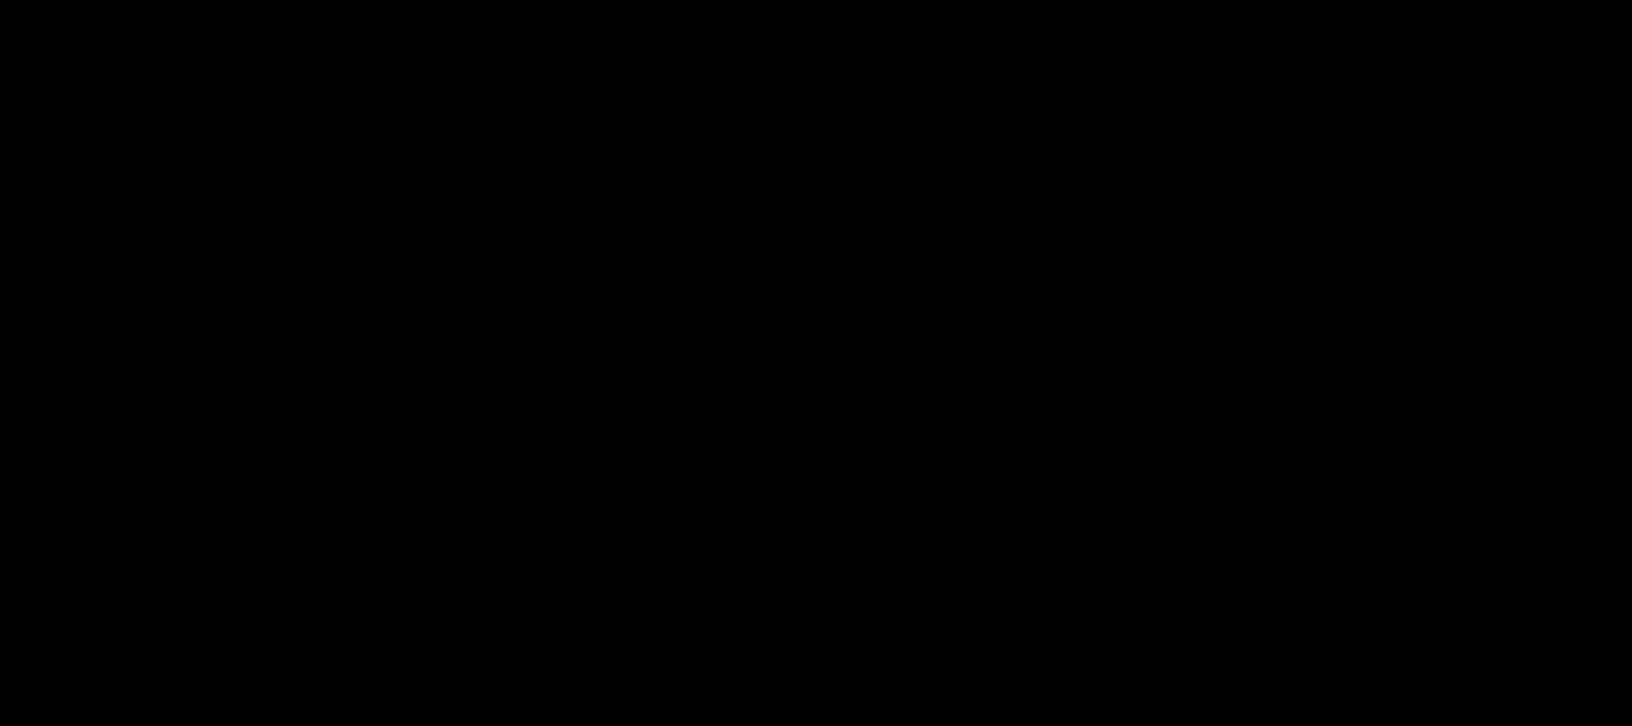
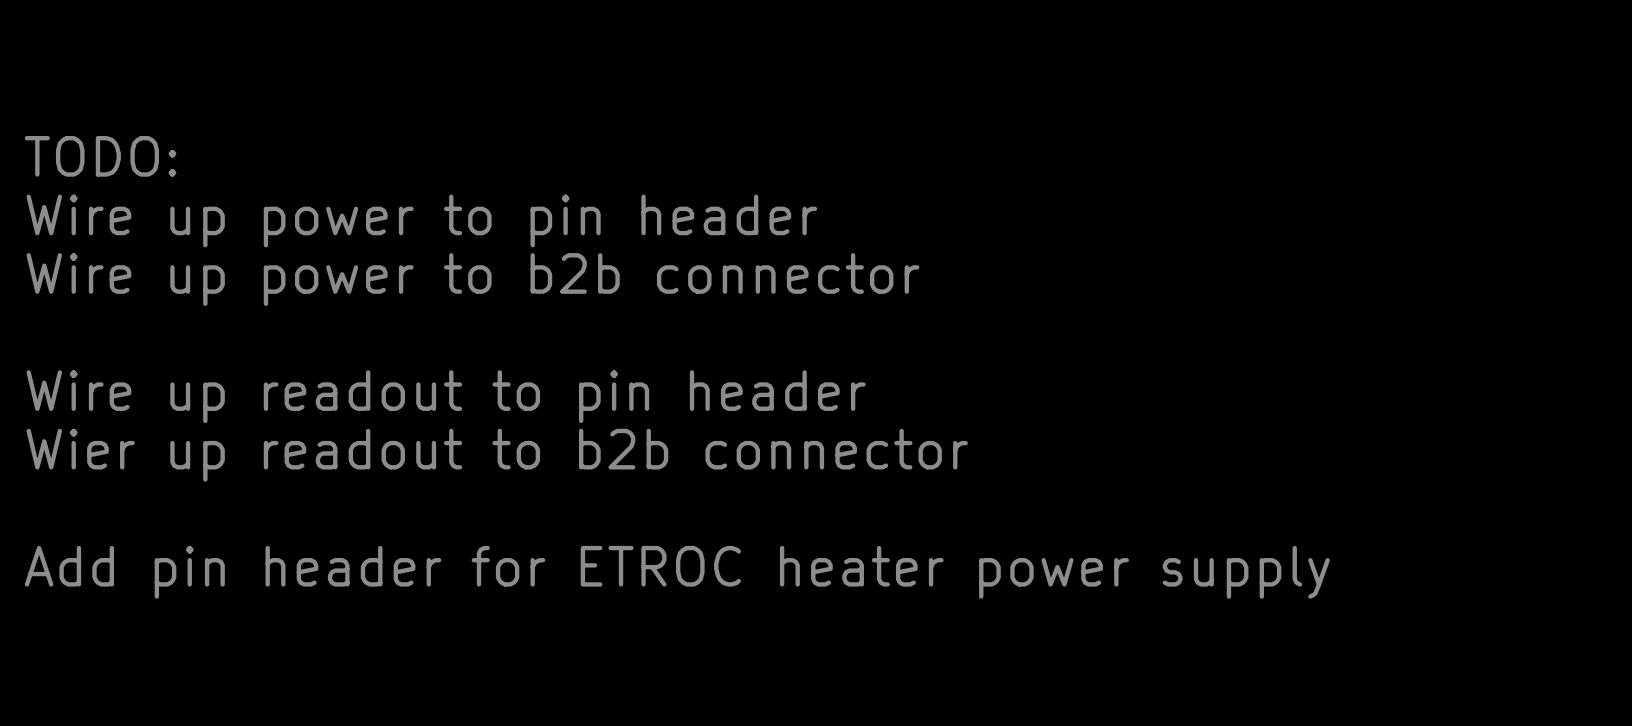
text: none -> TODO: (100, 156)
text: none -> Wire up power to pin header (421, 220)
text: none -> Wire up power to b2b connector (472, 279)
text: none -> Wire up readout to pin header (446, 396)
text: none -> Wier up readout to b2b connector (497, 455)
text: none -> Add pin header for ETROC heater power supply (677, 572)

